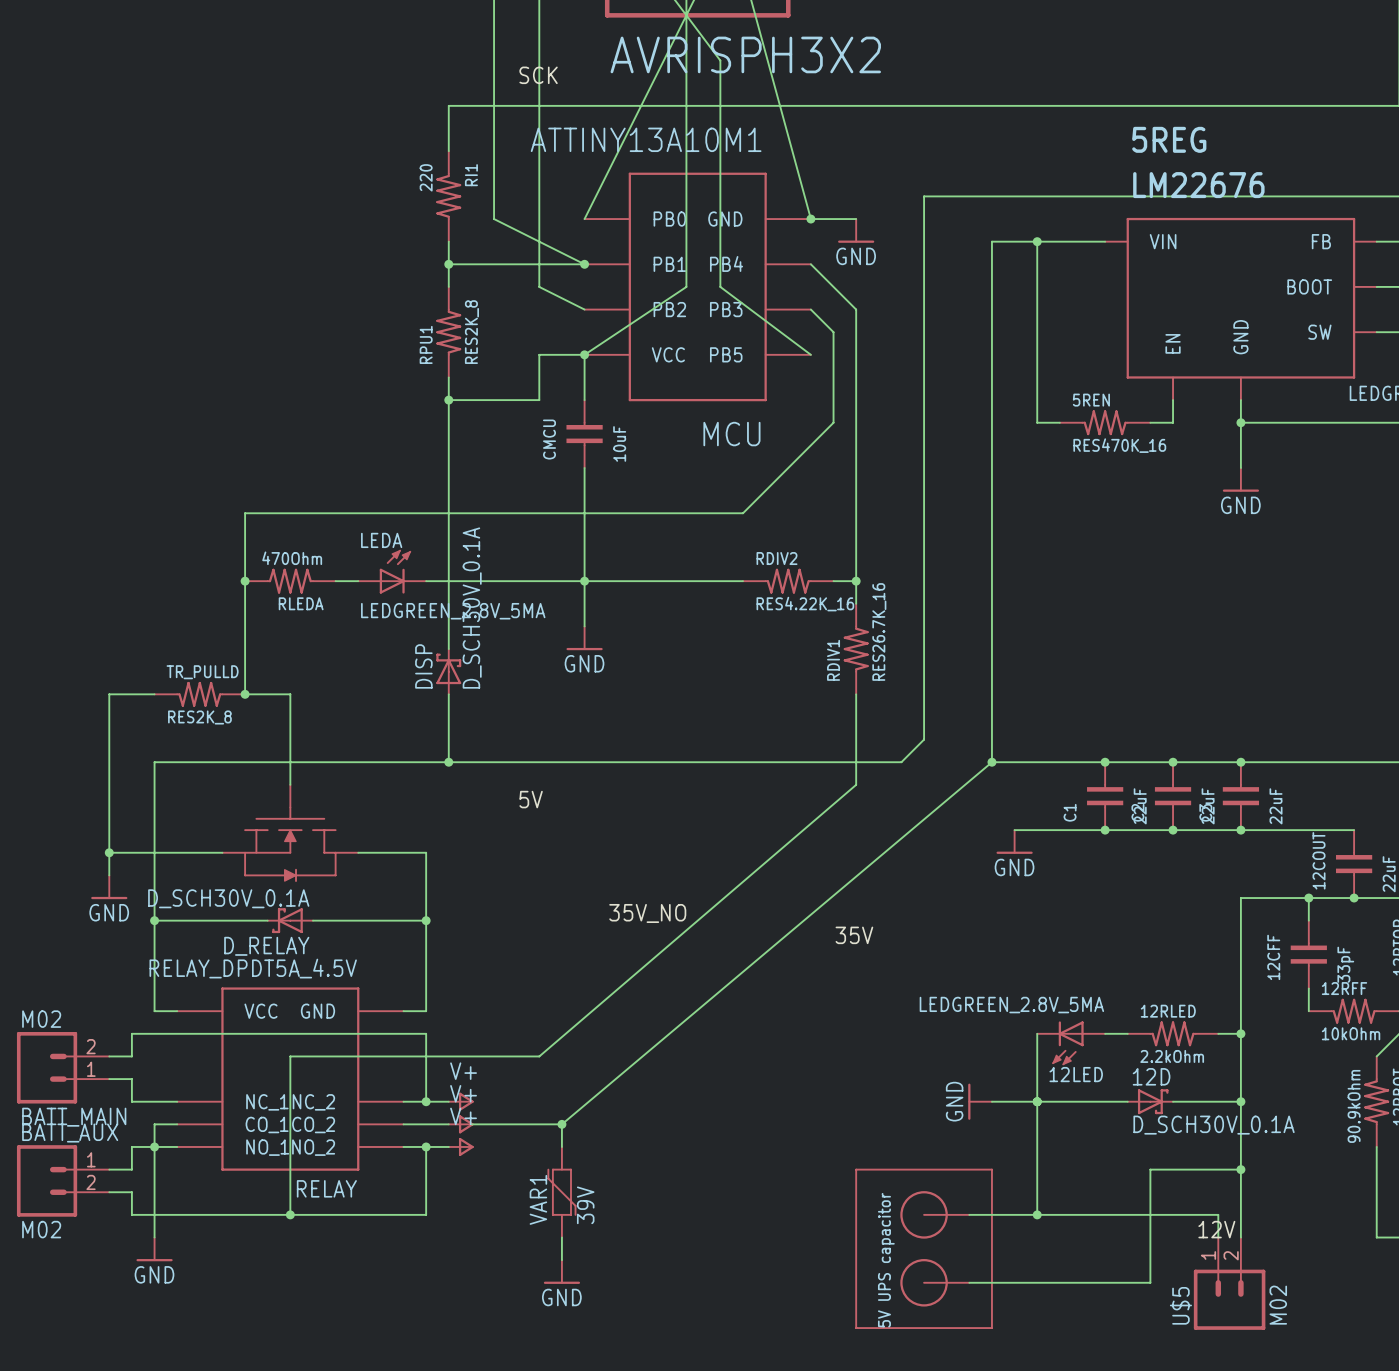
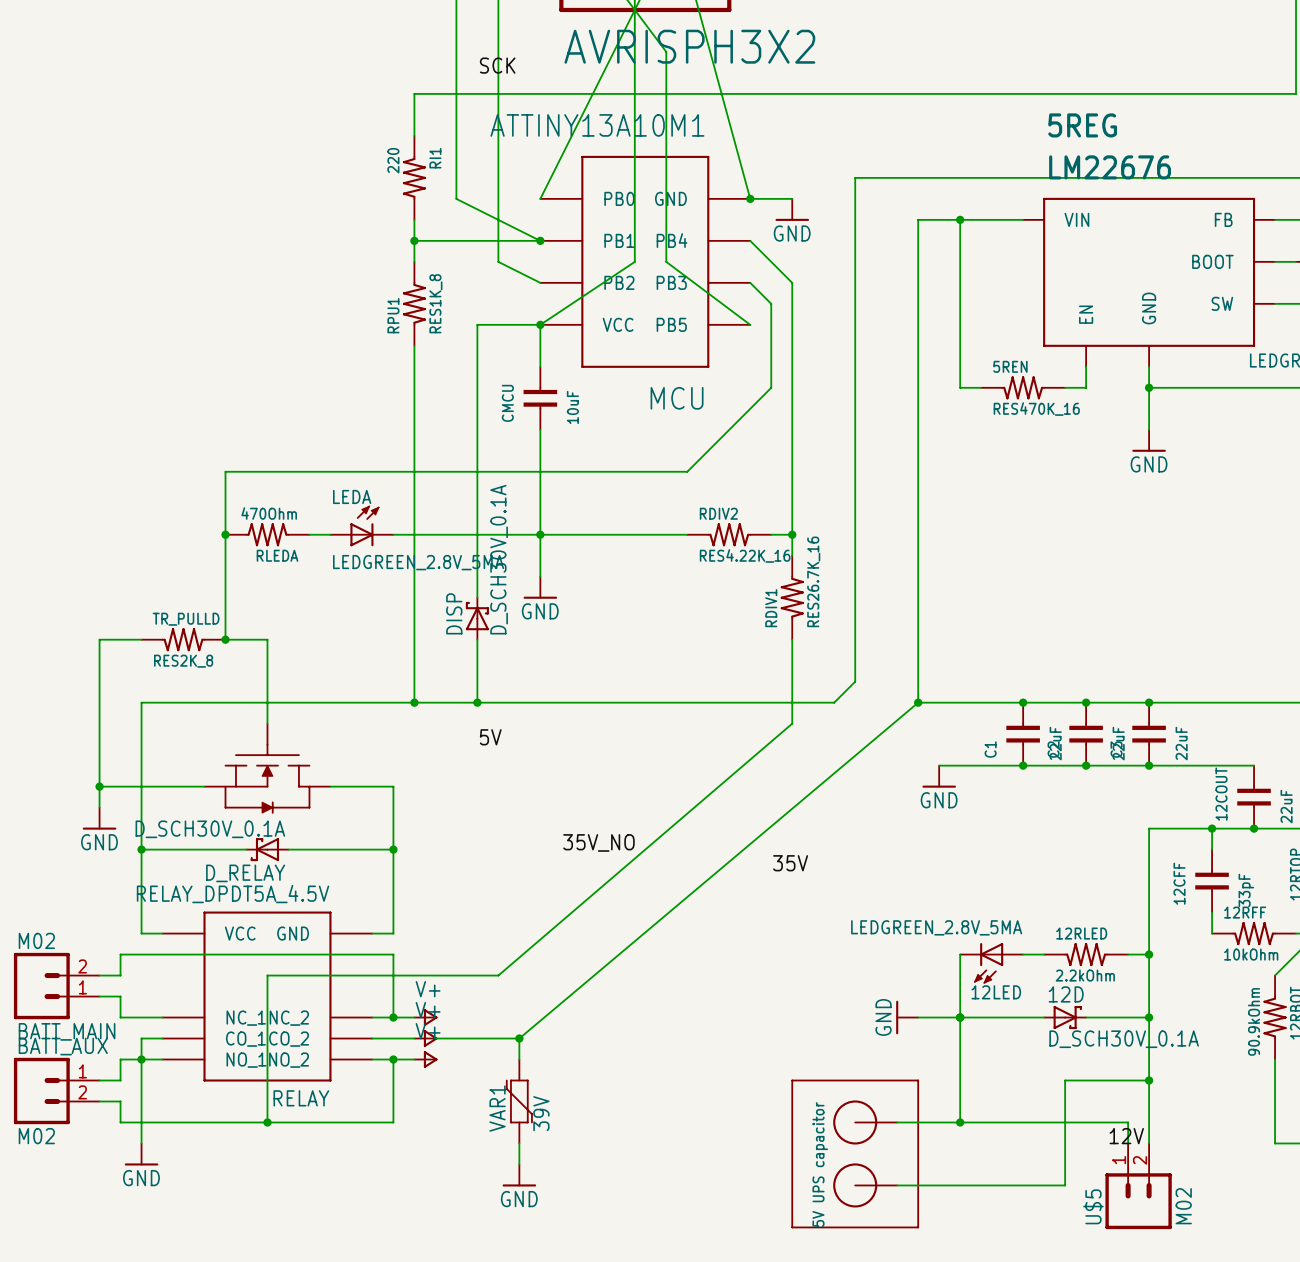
RPU1 value: RES2K_8 (471, 332) -> RES1K_8 (435, 303)
wire: (539, 354) (539, 400) (448, 400) -> (498, 324) (477, 324) (477, 597)
junction: (448, 400) -> none
DISP position: (448, 671) -> (477, 618)
wire: none -> (477, 639) (477, 702)
junction: none -> (477, 702)

